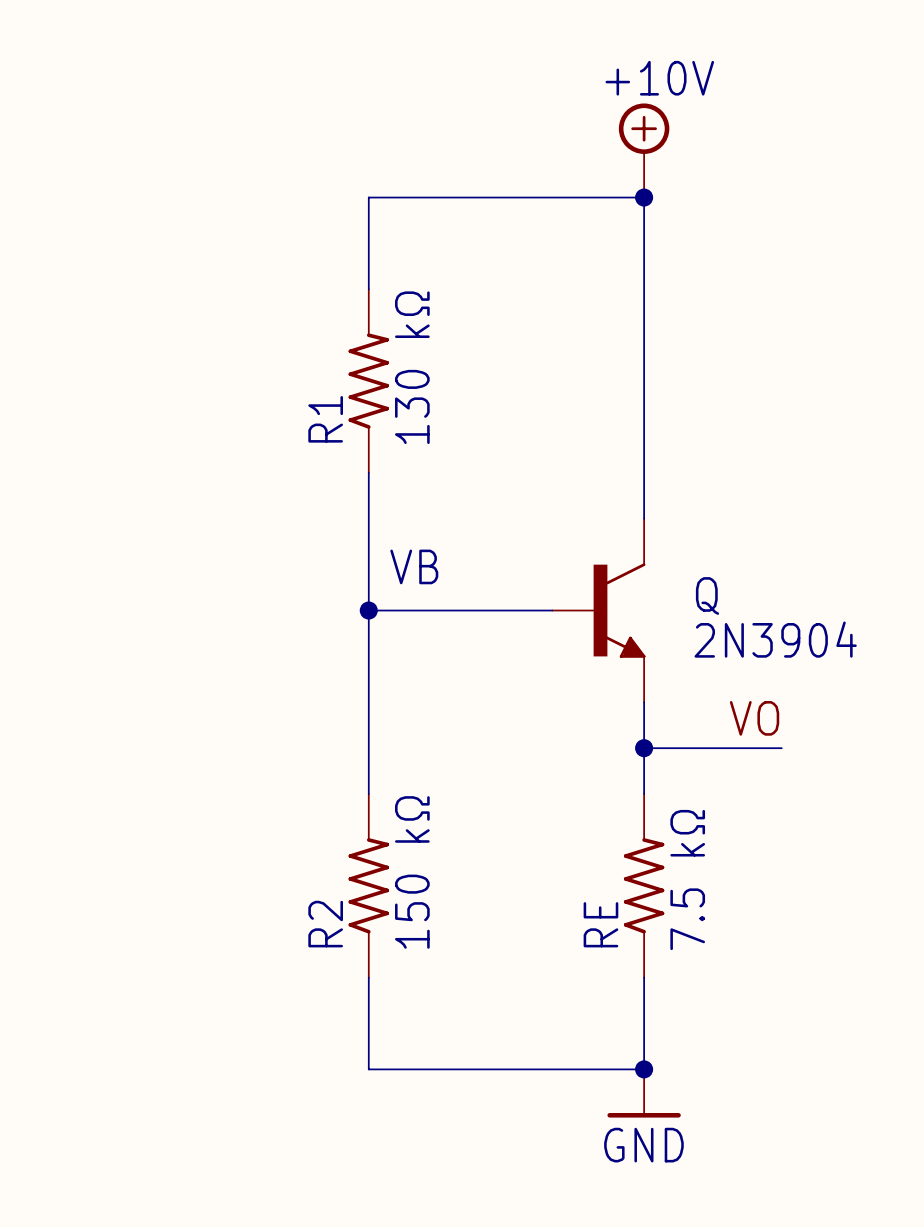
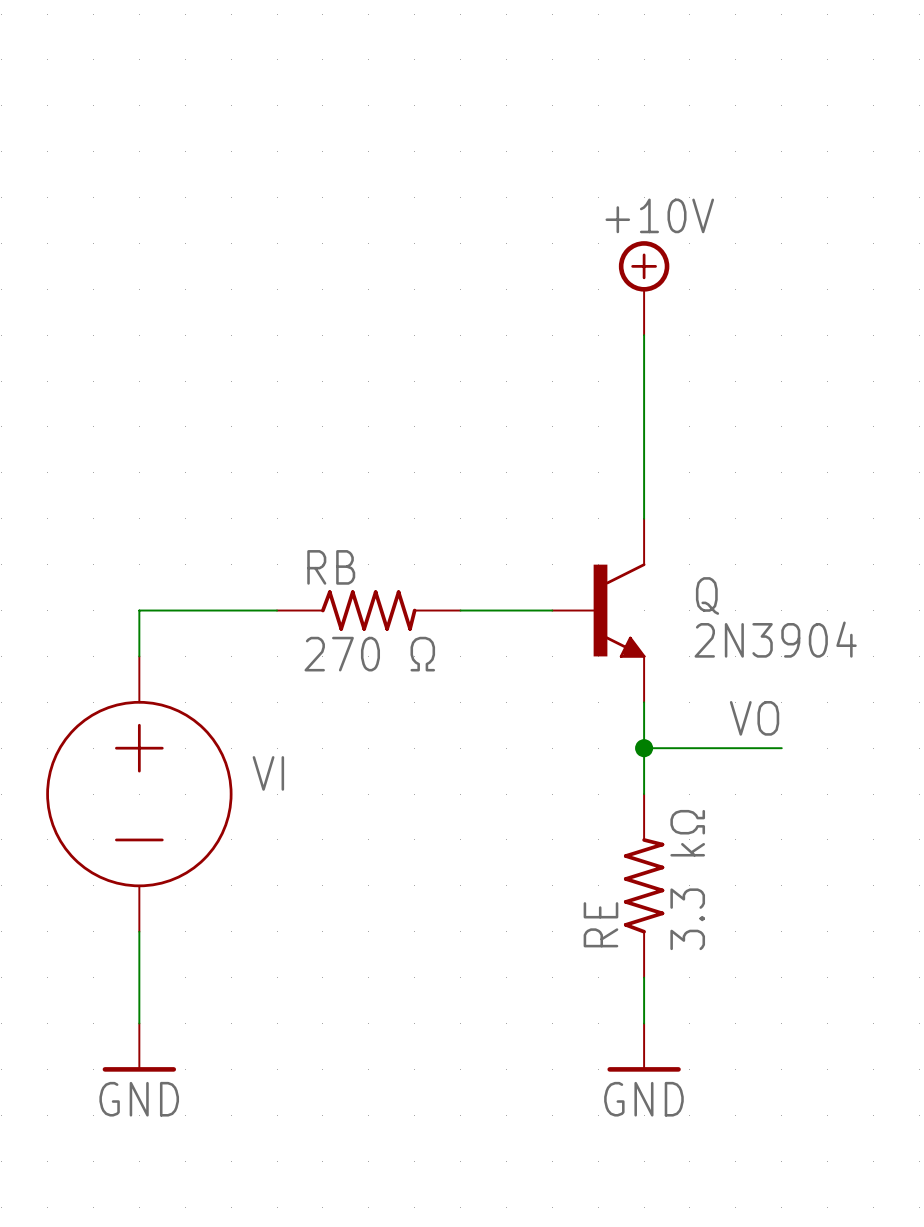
power symbol position: +10V (644, 150) -> +10V (644, 288)
junction: (644, 197) -> none
wire: (368, 289) (368, 197) (644, 197) (644, 335) -> none
R1: 130 kΩ (368, 381) -> none
wire: (368, 472) (368, 794) -> none
text: VB (414, 566) -> none
wire: none -> (277, 610) (139, 610) (139, 656)
RB: none -> 270 Ω (368, 610)
junction: (368, 610) -> none
VI: none -> (139, 794)
RE value: 7.5 kΩ (687, 880) -> 3.3 kΩ (687, 880)
R2: 150 kΩ (368, 885) -> none
wire: none -> (139, 931) (139, 1023)
wire: (368, 977) (368, 1069) (644, 1069) (644, 1023) -> none
power symbol: none -> GND (139, 1047)
junction: (644, 1069) -> none
power symbol position: GND (644, 1093) -> GND (644, 1047)

